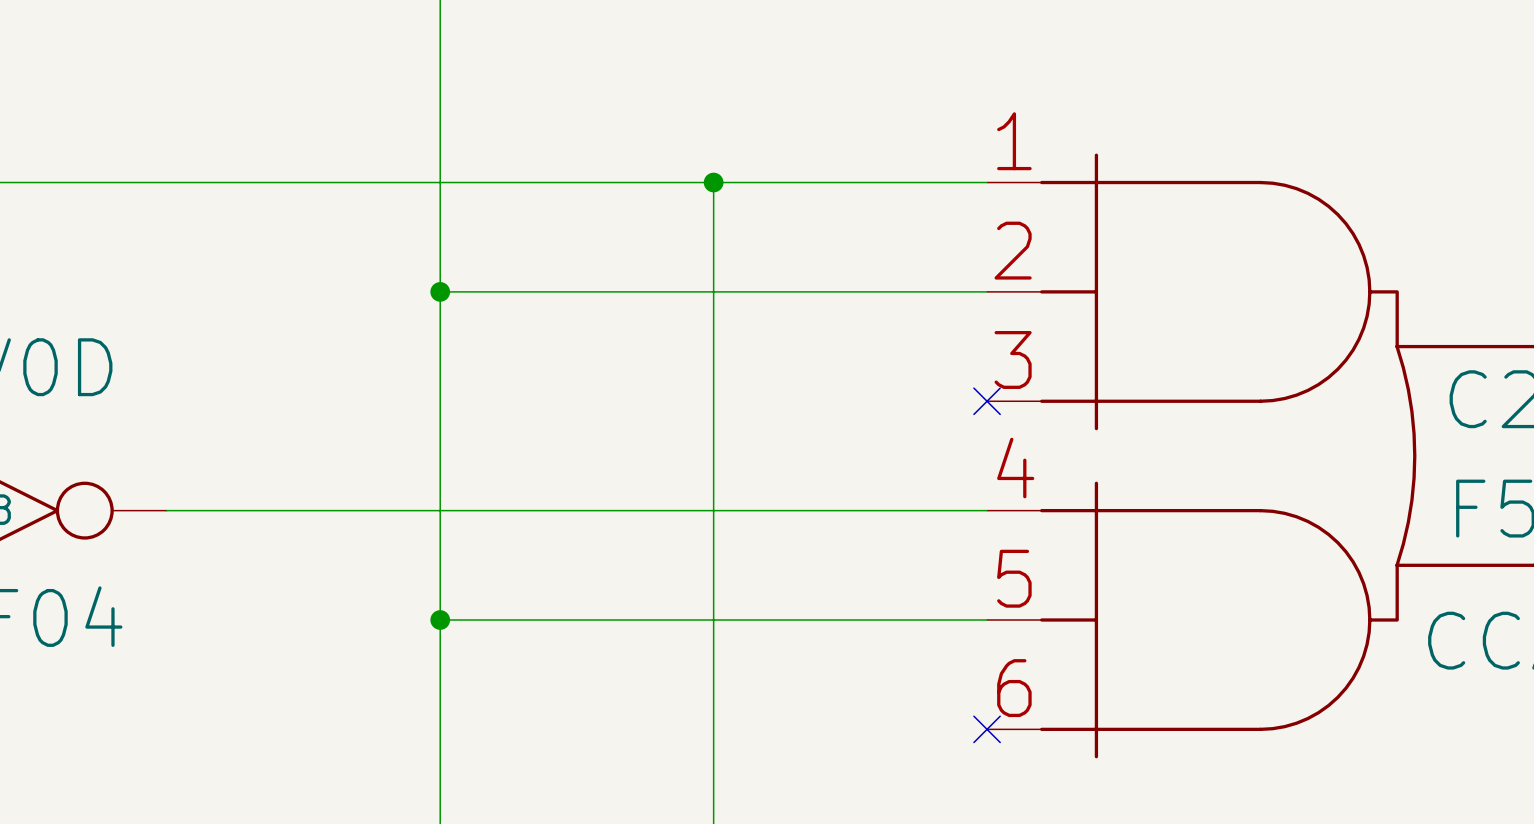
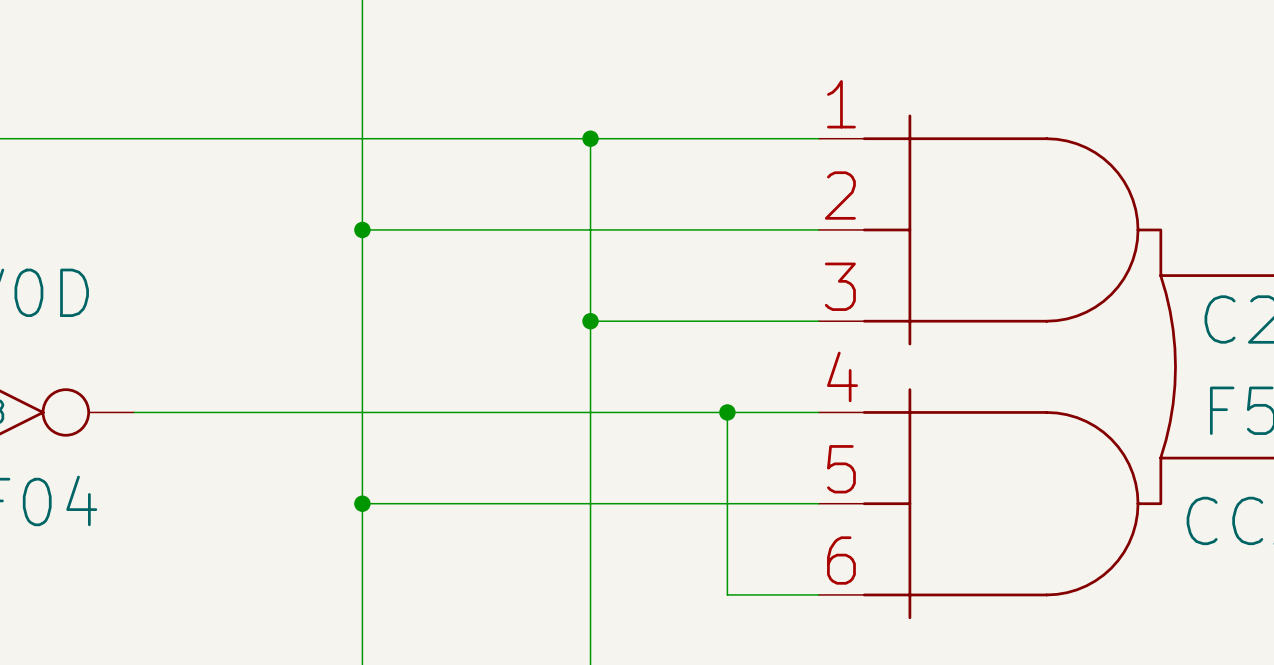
wire: none -> (590, 321) (818, 321)
junction: none -> (590, 321)
no-connect mark: (987, 401) -> none
wire: none -> (727, 412) (727, 594) (818, 594)
junction: none -> (727, 412)
no-connect mark: (987, 729) -> none

